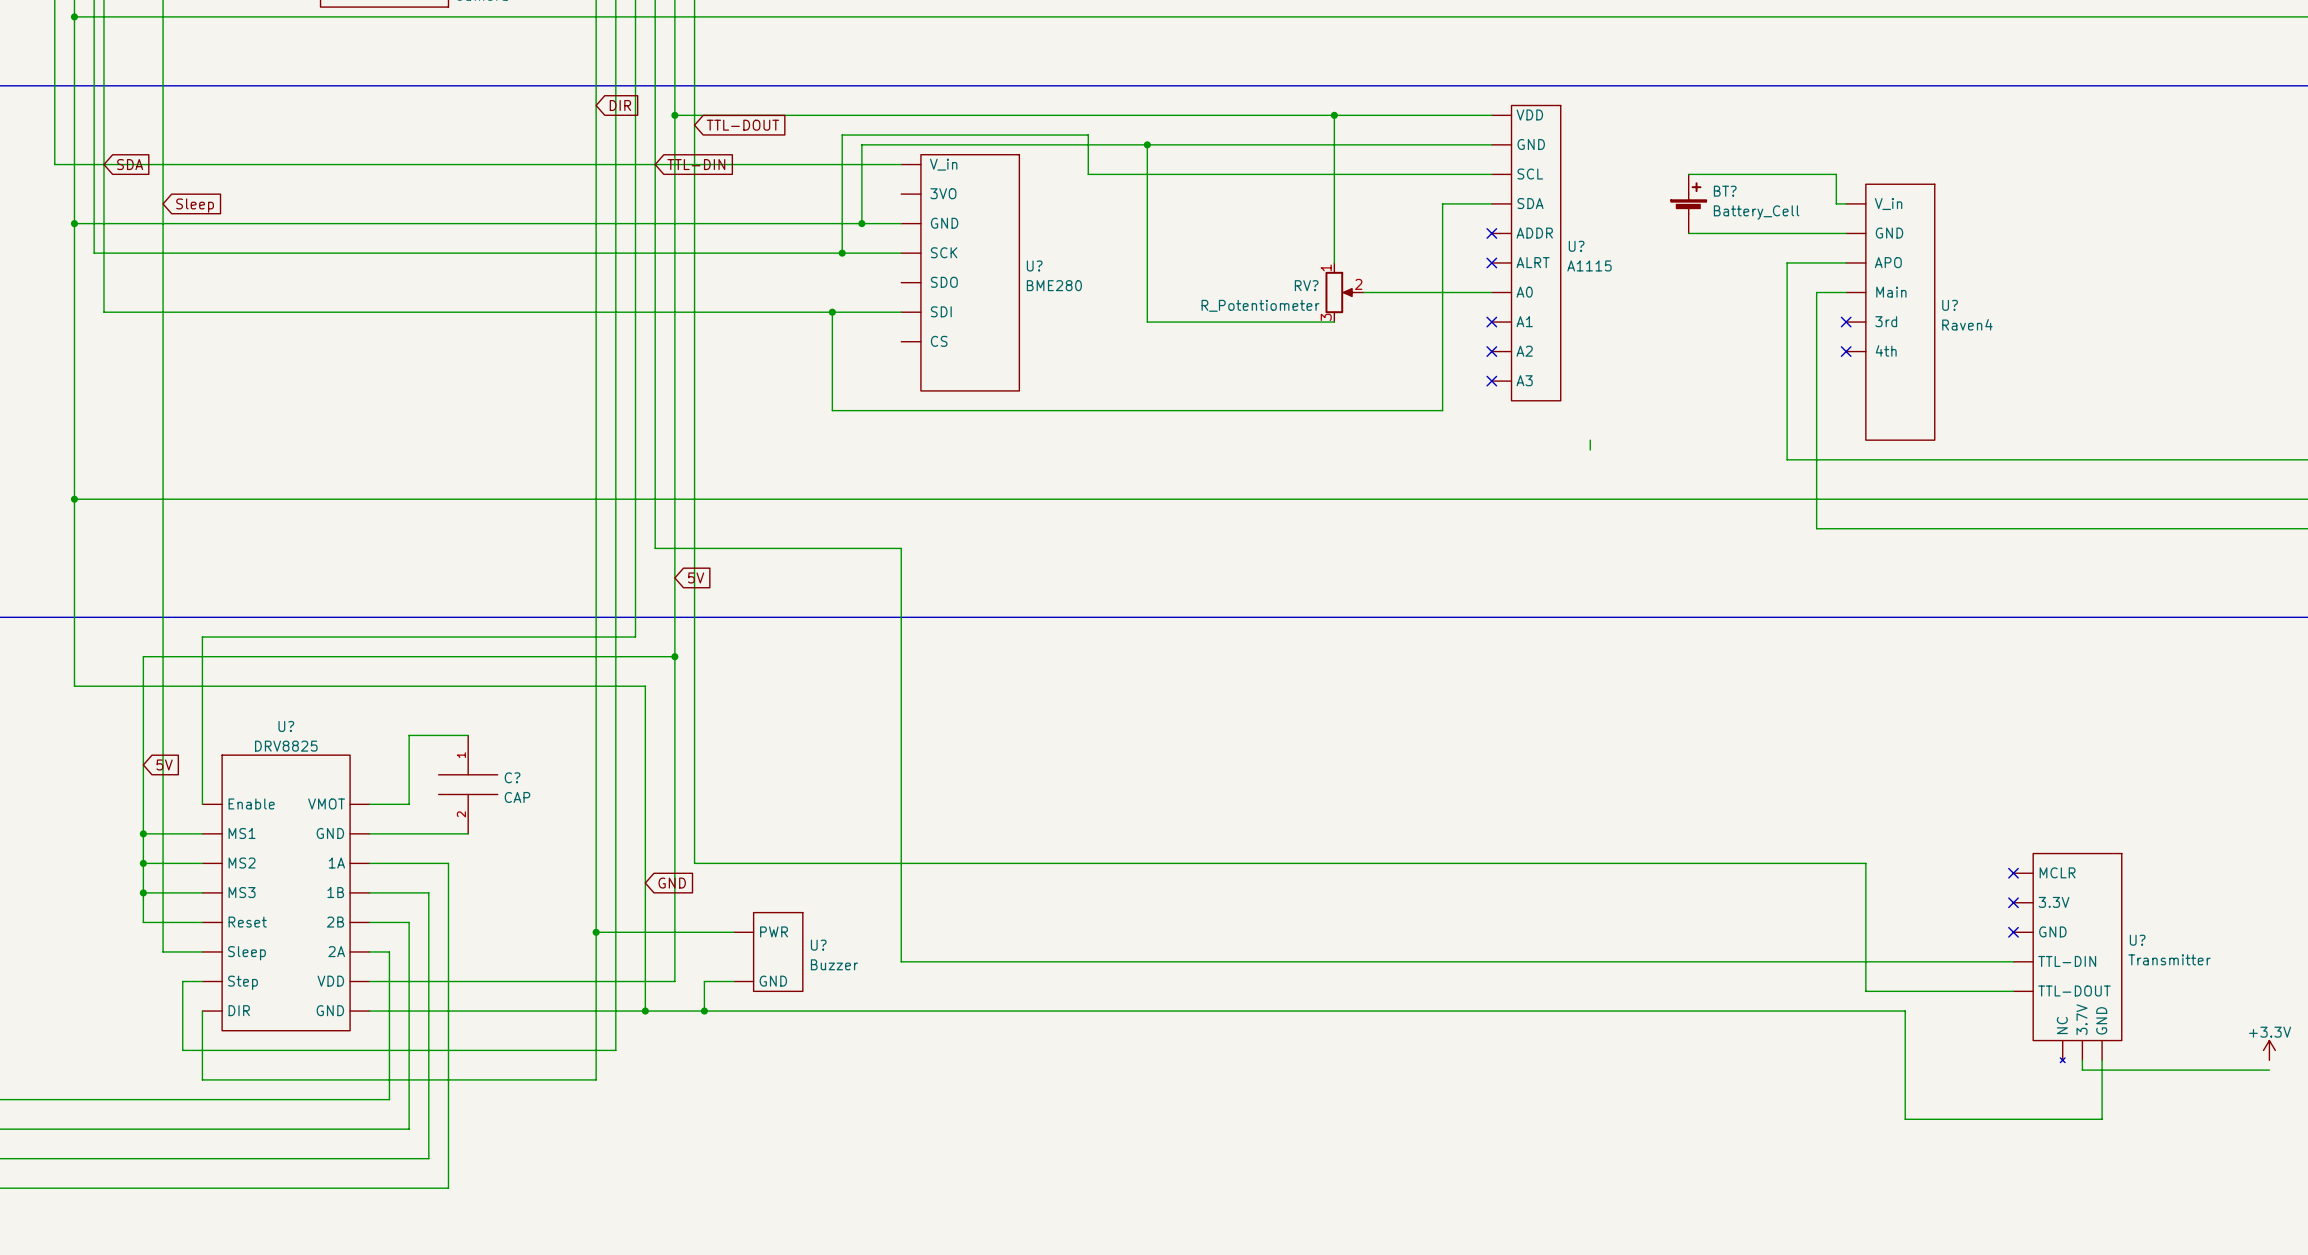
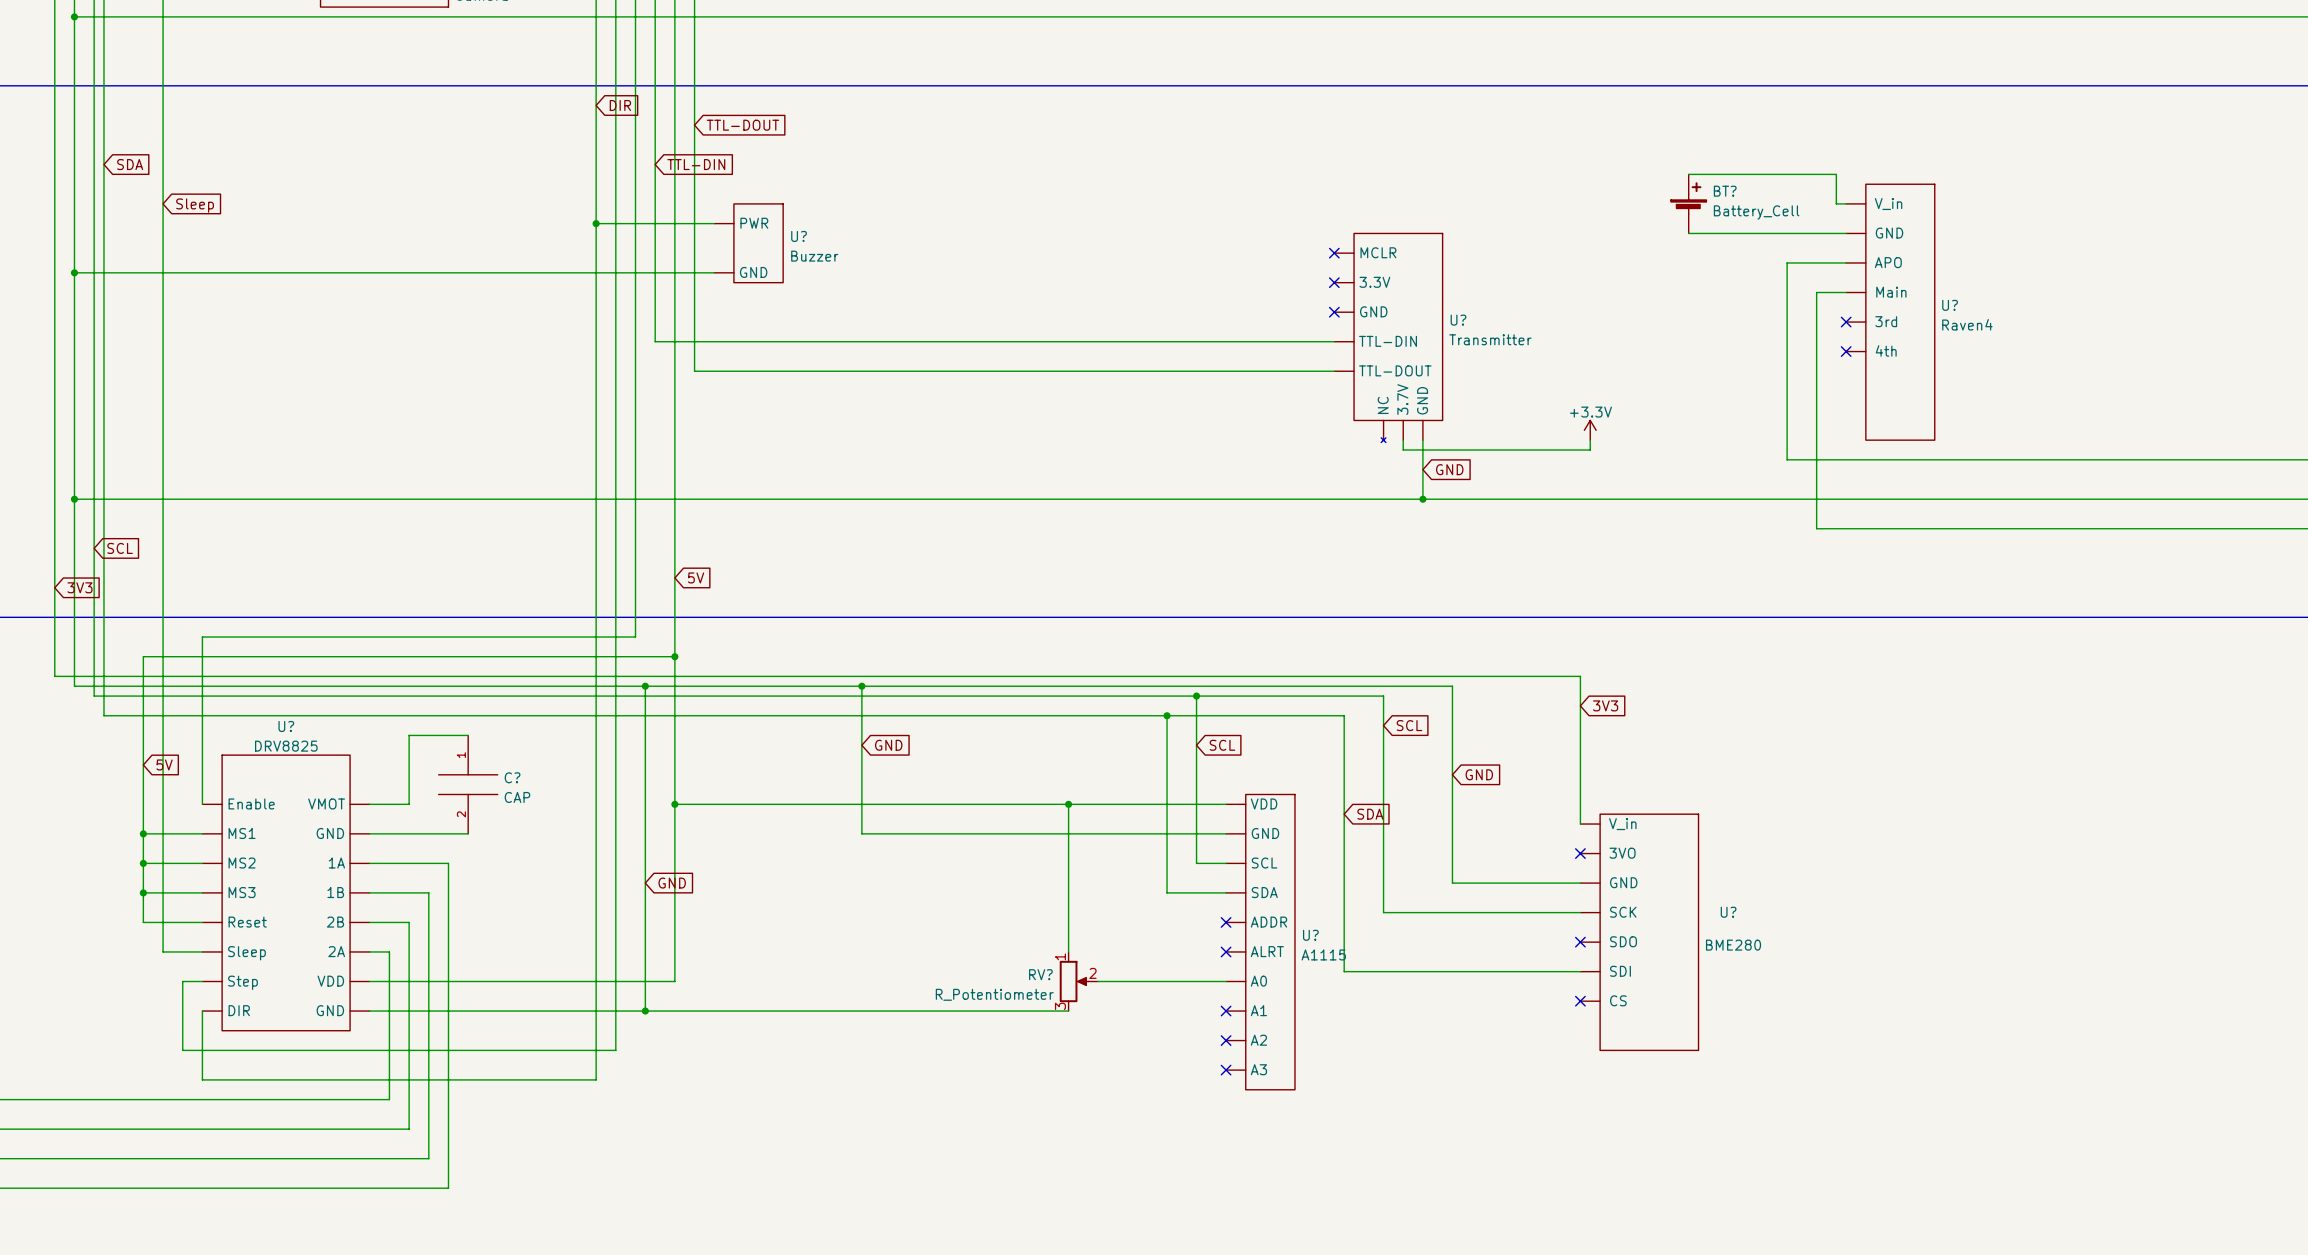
wire: (674, 115) (1491, 115) -> none
junction: (674, 115) -> none
wire: (1334, 115) (1334, 262) -> none
junction: (1334, 115) -> none
wire: (1147, 144) (1147, 322) (1334, 322) -> none
junction: (1147, 144) -> none
wire: (1491, 144) (861, 144) (861, 223) -> none
wire: (54, 164) (901, 164) -> (54, 164) (54, 676) (1580, 676) (1580, 824)
wire: (1491, 174) (1088, 174) (1088, 135) (842, 135) (842, 253) -> none
wire: (1491, 203) (1442, 203) (1442, 410) (832, 410) (832, 312) -> none
wire: (74, 223) (596, 223) -> none
junction: (74, 223) -> none
junction: none -> (596, 223)
wire: (714, 223) (901, 223) -> none
junction: (861, 223) -> none
no-connect mark: (1491, 233) -> none
U?: none -> Buzzer (748, 243)
wire: (94, 253) (901, 253) -> (94, 253) (94, 696) (1383, 696) (1383, 912) (1580, 912)
junction: (842, 253) -> none
no-connect mark: none -> (1334, 253)
U?: A1115 (1526, 253) -> none
no-connect mark: (1491, 262) -> none
wire: none -> (74, 272) (714, 272)
junction: none -> (74, 272)
U?: BME280 (960, 272) -> none
no-connect mark: none -> (1334, 282)
RV?: R_Potentiometer (1344, 292) -> none
wire: (1363, 292) (1491, 292) -> none
wire: (103, 312) (901, 312) -> (103, 312) (103, 715) (1344, 715) (1344, 971) (1580, 971)
junction: (832, 312) -> none
no-connect mark: none -> (1334, 312)
no-connect mark: (1491, 322) -> none
U?: none -> Transmitter (1388, 337)
wire: (655, 341) (655, 548) (901, 548) (901, 961) (2013, 961) -> (655, 341) (1334, 341)
no-connect mark: (1491, 351) -> none
wire: (694, 371) (694, 863) (1196, 863) -> (694, 371) (1334, 371)
no-connect mark: (1491, 381) -> none
power symbol: none -> +3.3V (1590, 430)
wire: none -> (1403, 440) (1403, 449) (1590, 449)
wire: none -> (1422, 440) (1422, 499)
global label: none -> GND (1449, 469)
junction: none -> (1422, 499)
global label: none -> SCL (120, 548)
global label: none -> 3V3 (79, 587)
wire: none -> (645, 686) (1452, 686) (1452, 883) (1580, 883)
junction: none -> (645, 686)
wire: none -> (861, 686) (861, 833) (1226, 833)
junction: none -> (861, 686)
wire: none -> (1196, 696) (1196, 863)
junction: none -> (1196, 696)
global label: none -> 3V3 (1605, 705)
wire: none -> (1167, 715) (1167, 892) (1226, 892)
junction: none -> (1167, 715)
global label: none -> SCL (1409, 725)
global label: none -> GND (888, 745)
global label: none -> SCL (1222, 745)
global label: none -> GND (1479, 774)
wire: none -> (674, 804) (1226, 804)
junction: none -> (674, 804)
wire: none -> (1068, 804) (1068, 951)
junction: none -> (1068, 804)
global label: none -> SDA (1370, 814)
no-connect mark: none -> (1580, 853)
wire: (1226, 863) (1865, 863) (1865, 991) (2013, 991) -> none
no-connect mark: (2013, 873) -> none
no-connect mark: (2013, 902) -> none
no-connect mark: none -> (1226, 922)
wire: (596, 932) (733, 932) -> none
junction: (596, 932) -> none
U?: none -> BME280 (1639, 932)
no-connect mark: (2013, 932) -> none
U?: none -> A1115 (1260, 942)
no-connect mark: none -> (1580, 942)
U?: Buzzer (768, 951) -> none
no-connect mark: none -> (1226, 951)
U?: Transmitter (2067, 957) -> none
wire: (733, 981) (704, 981) (704, 1011) -> none
RV?: none -> R_Potentiometer (1078, 981)
wire: none -> (1098, 981) (1226, 981)
no-connect mark: none -> (1580, 1001)
junction: (704, 1011) -> none
wire: (1068, 1011) (1905, 1011) (1905, 1119) (2102, 1119) (2102, 1060) -> none
no-connect mark: none -> (1226, 1011)
no-connect mark: none -> (1226, 1040)
power symbol: +3.3V (2269, 1050) -> none
wire: (2082, 1060) (2082, 1070) (2269, 1070) -> none
no-connect mark: none -> (1226, 1070)

